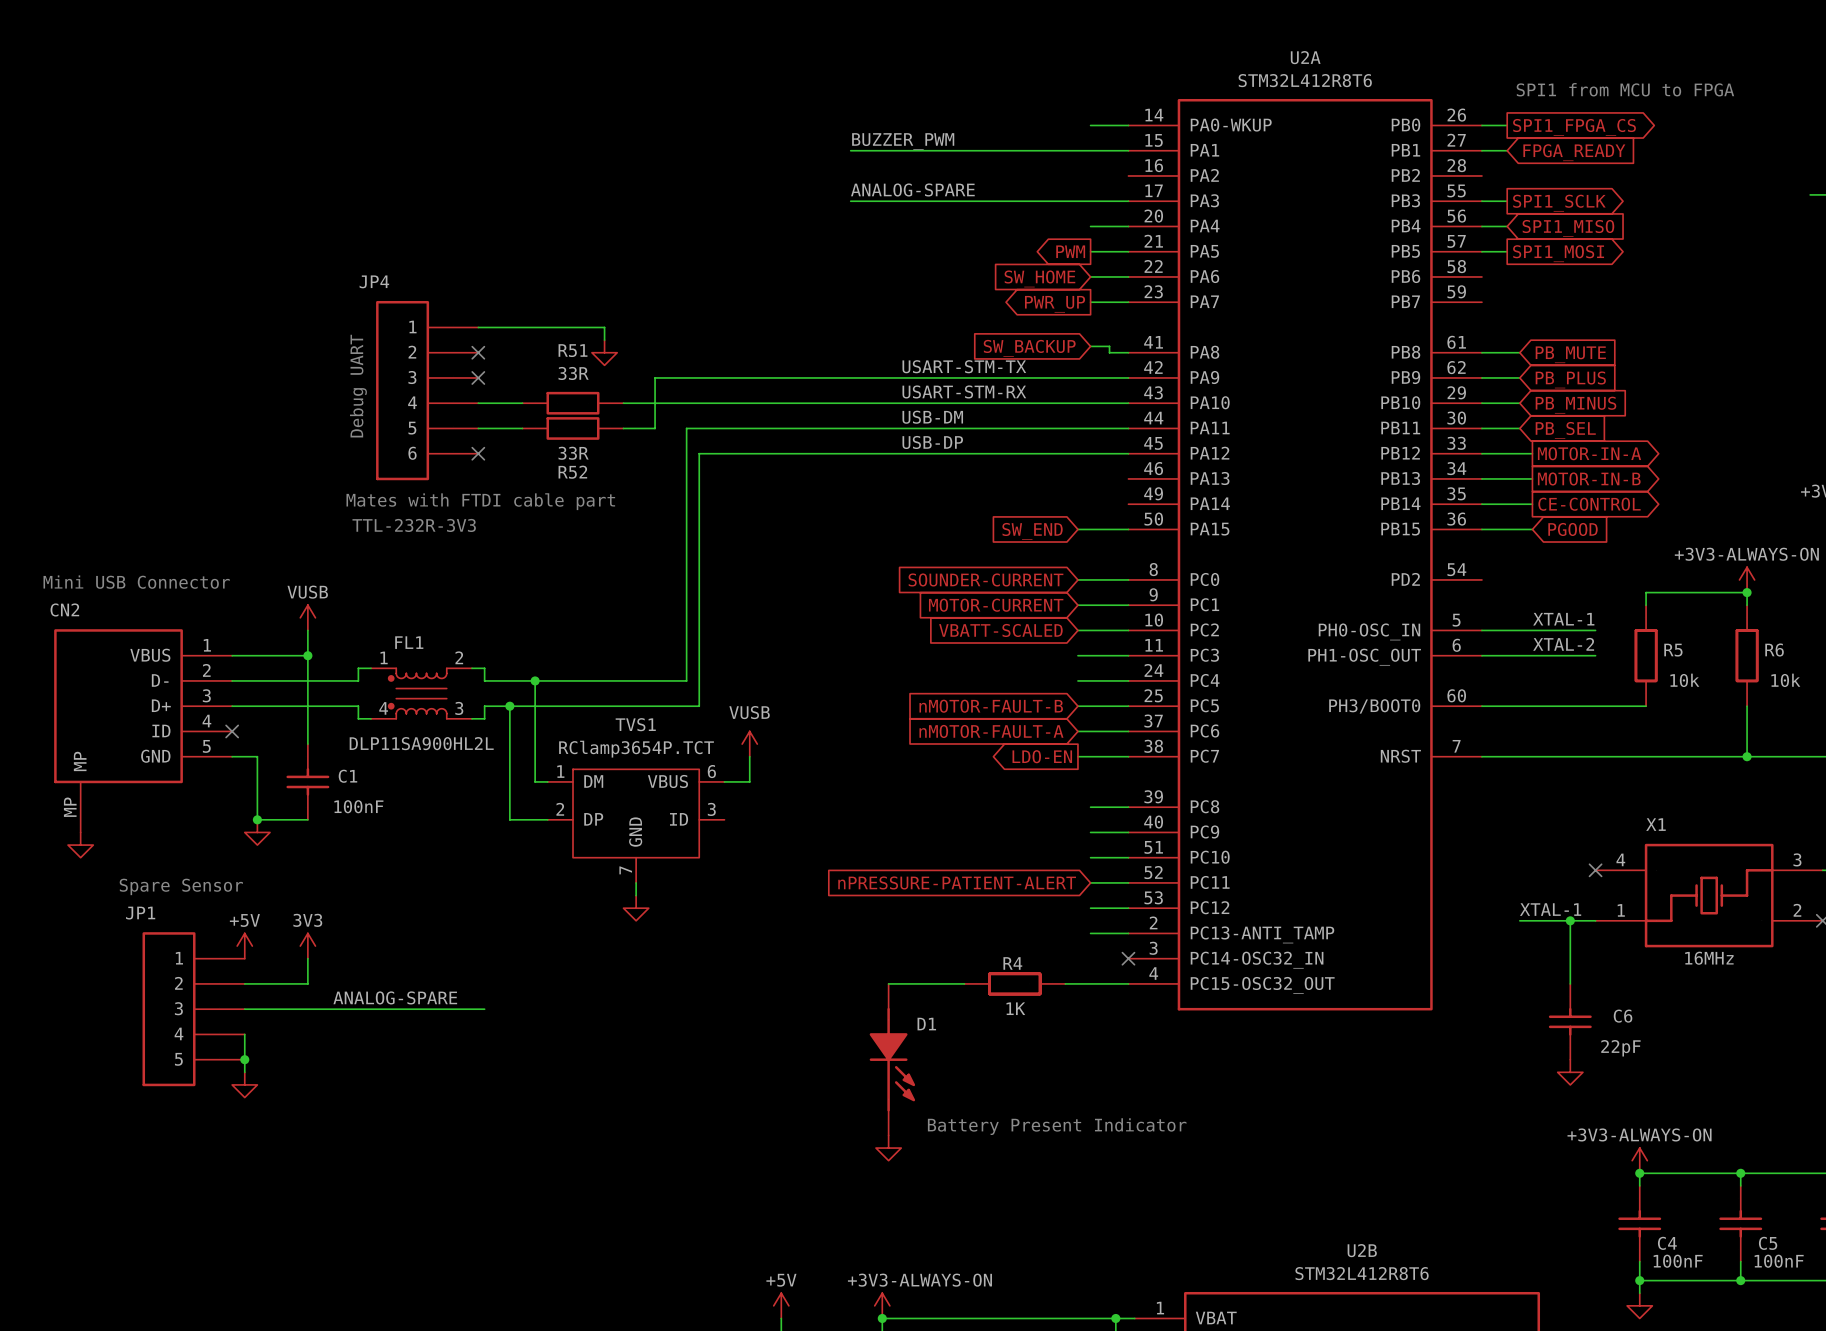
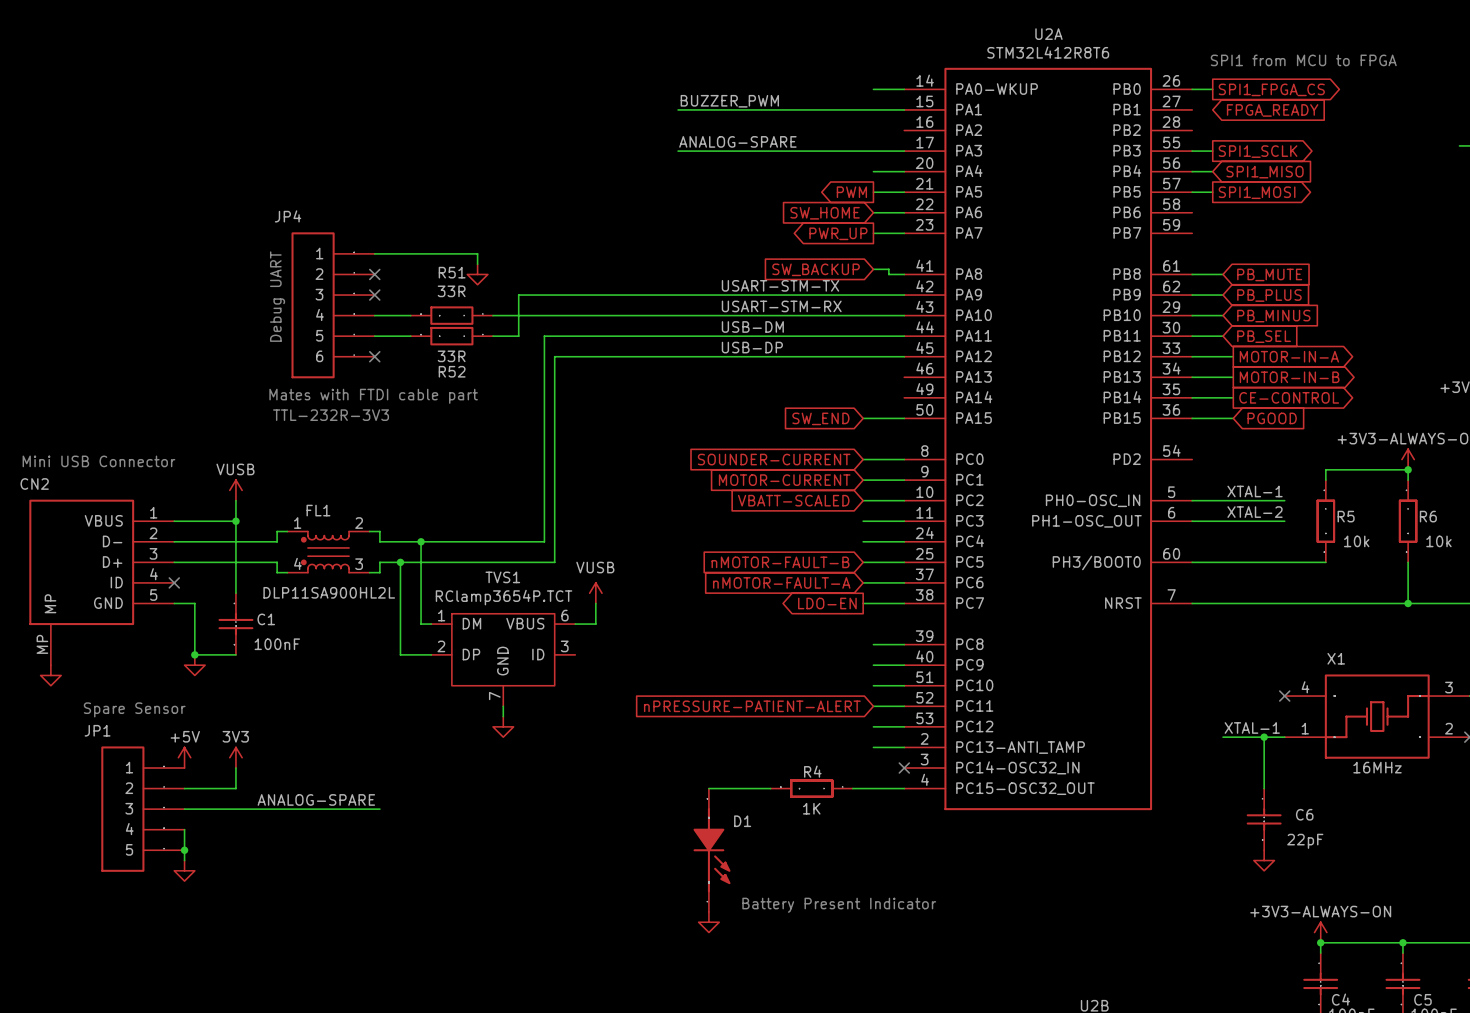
wire: (1481, 150) (1507, 150) -> none

